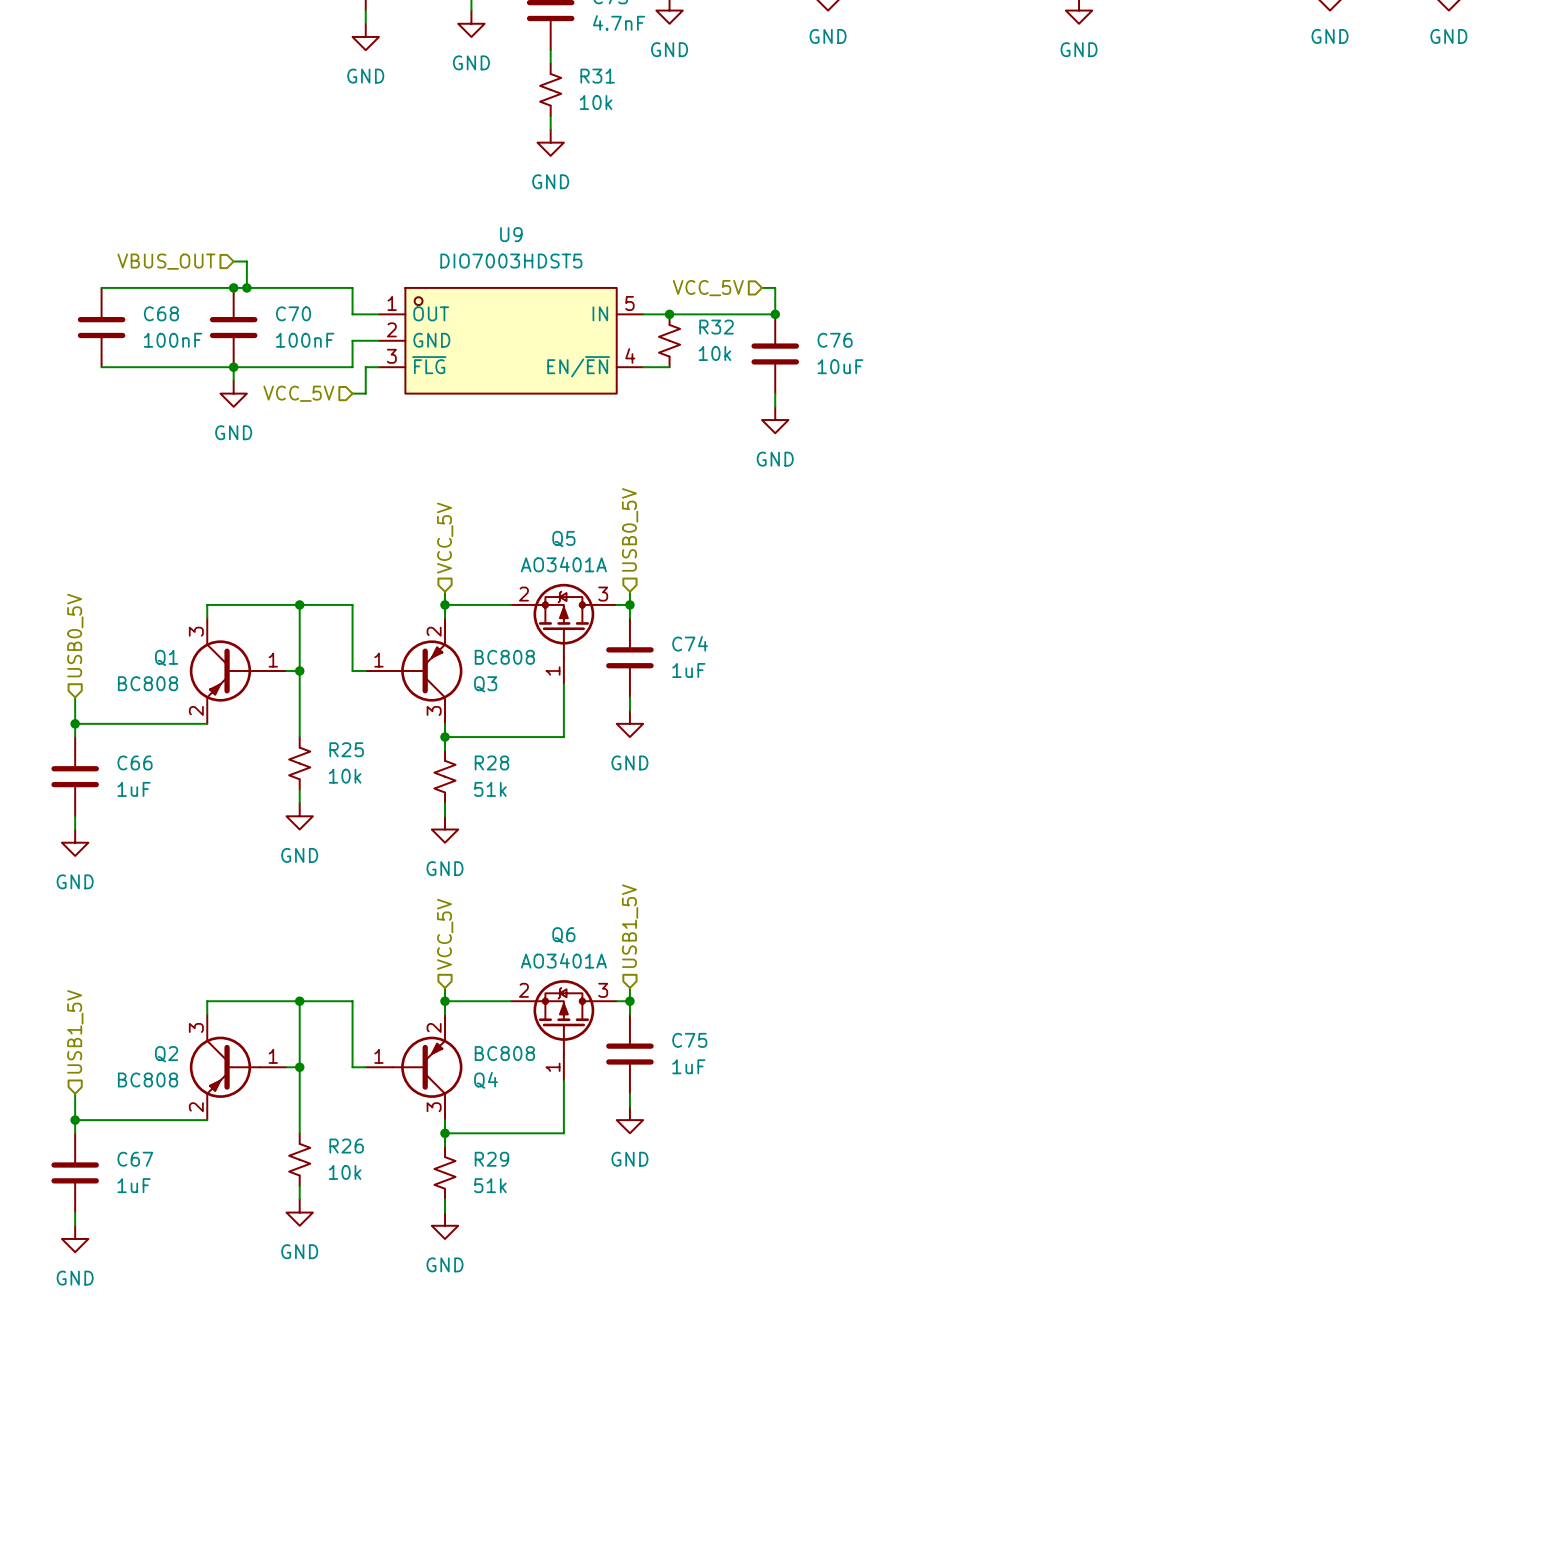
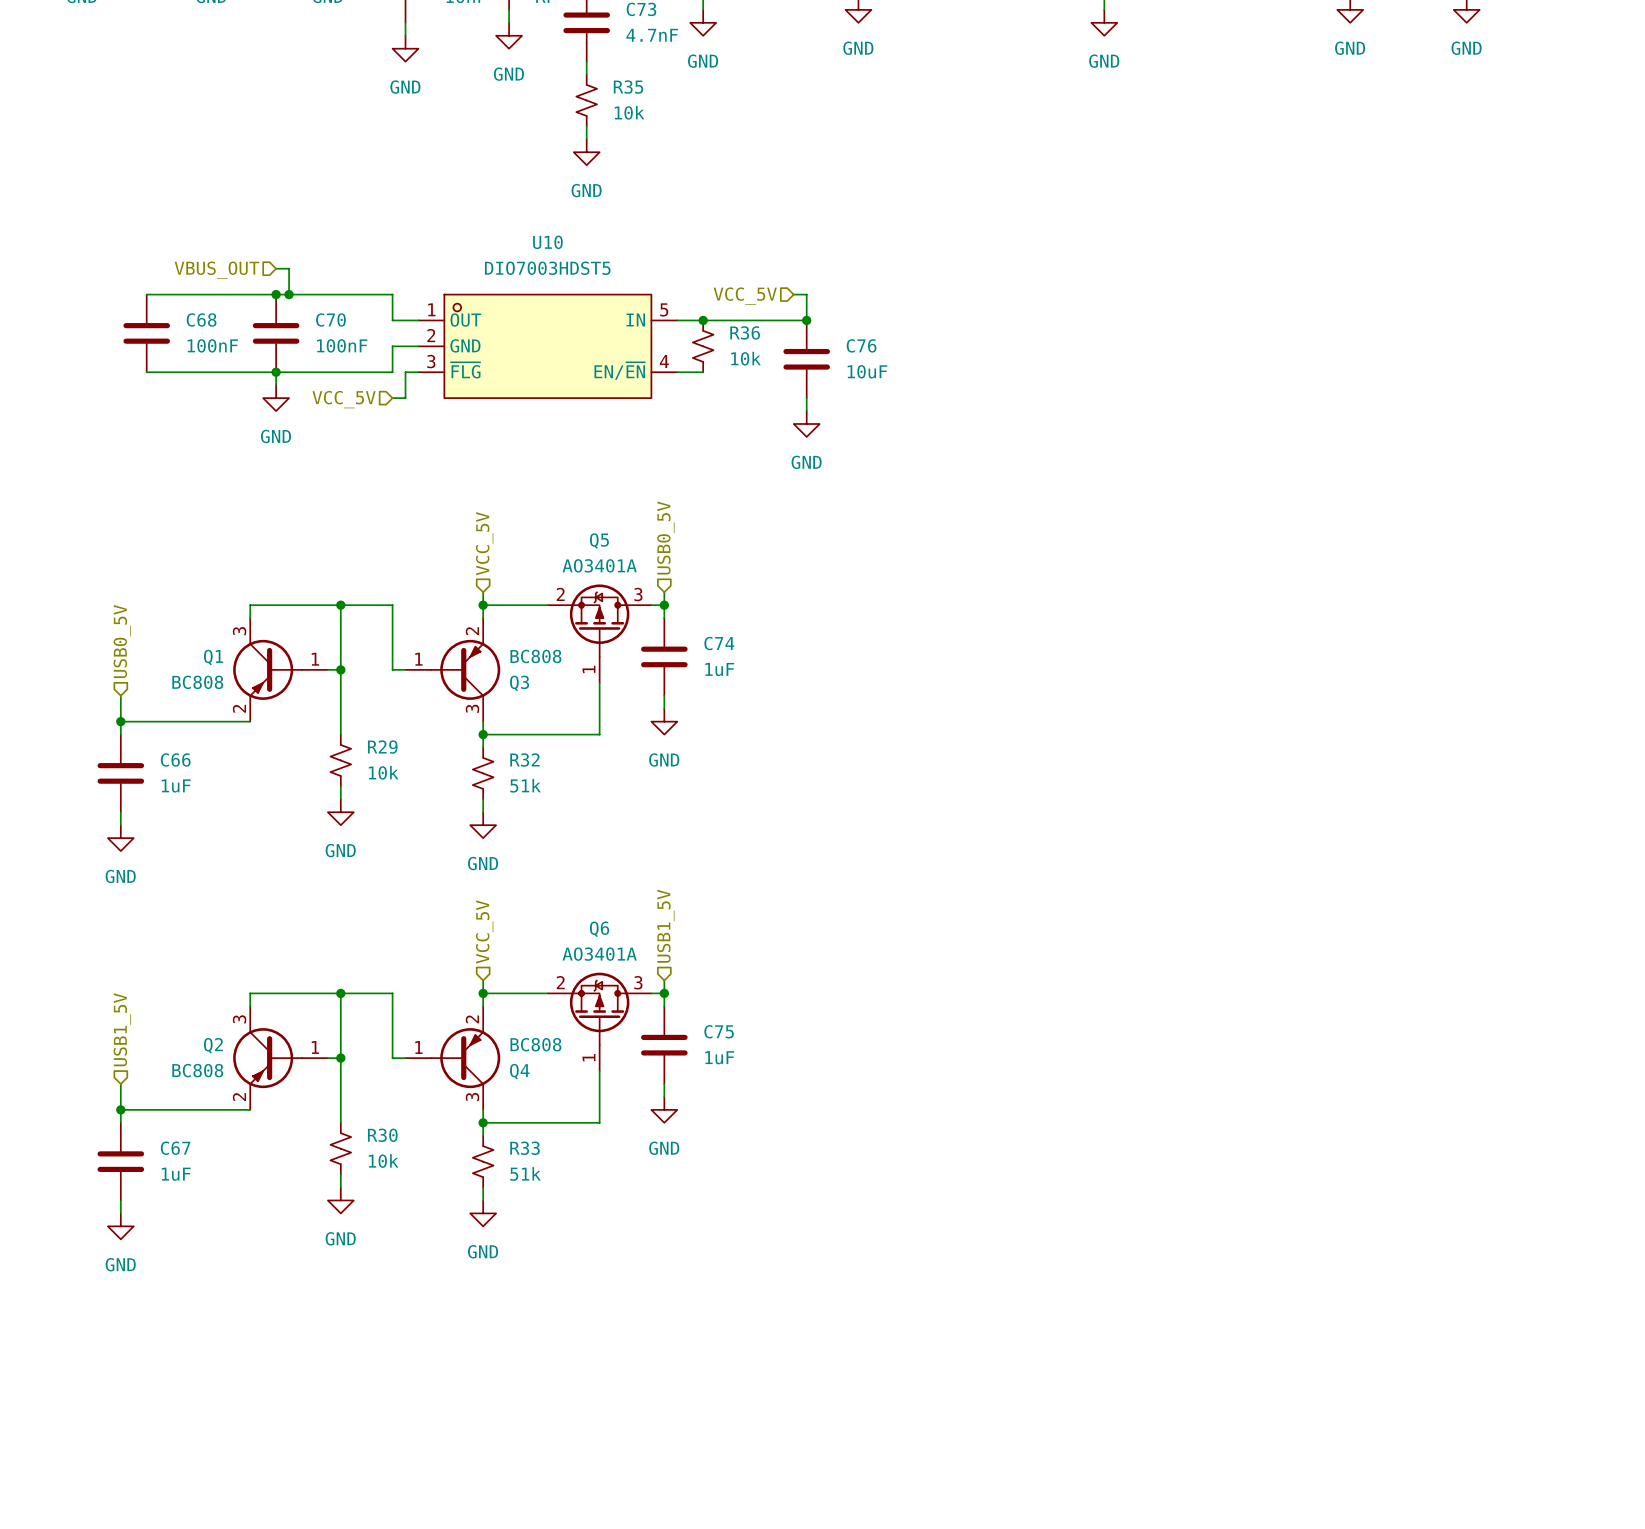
R31 name: R31 (597, 76) -> R35 (628, 87)
U9 name: U9 (511, 234) -> U10 (547, 242)
R32 name: R32 (716, 327) -> R36 (745, 332)
R25 name: R25 (346, 749) -> R29 (382, 747)
R28 name: R28 (491, 762) -> R32 (524, 759)
R26 name: R26 (346, 1146) -> R30 (382, 1135)
R29 name: R29 (491, 1159) -> R33 (525, 1148)

